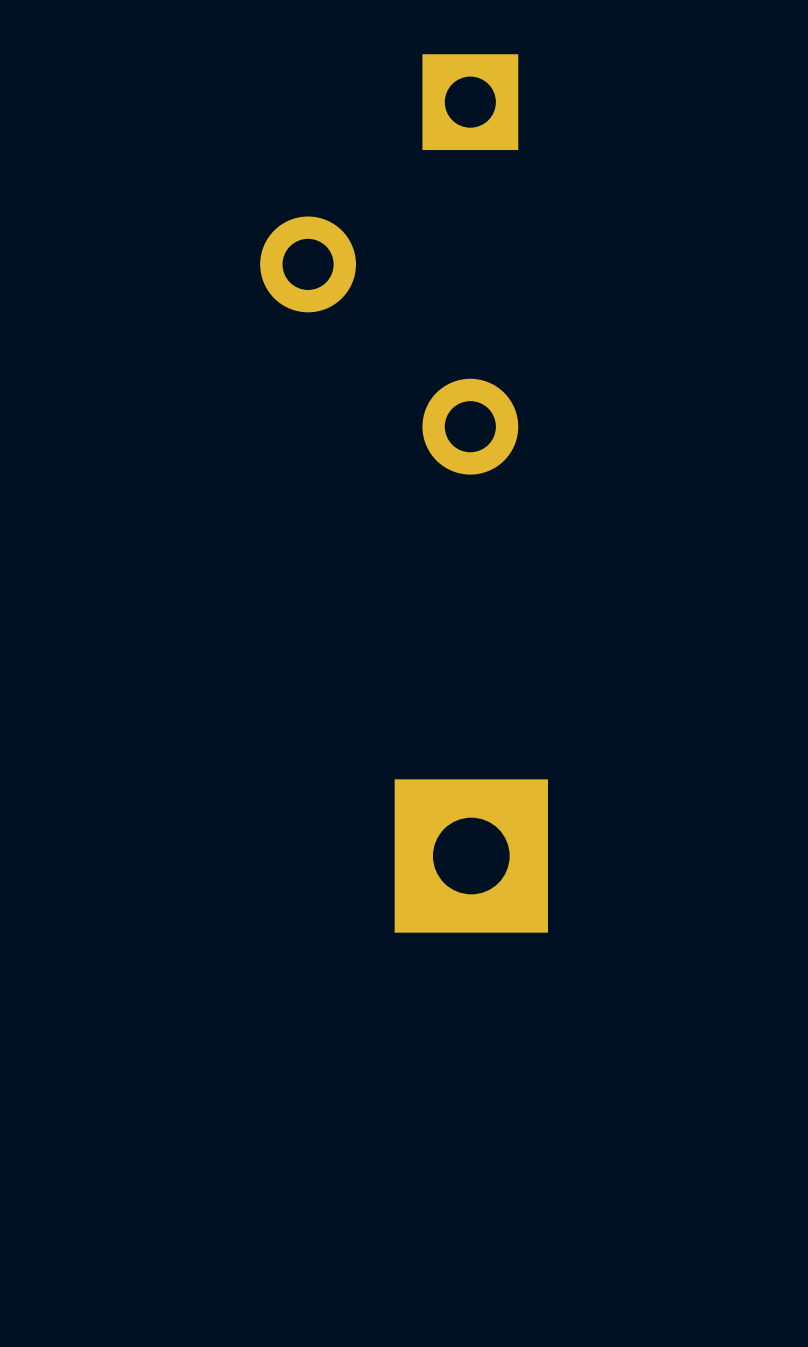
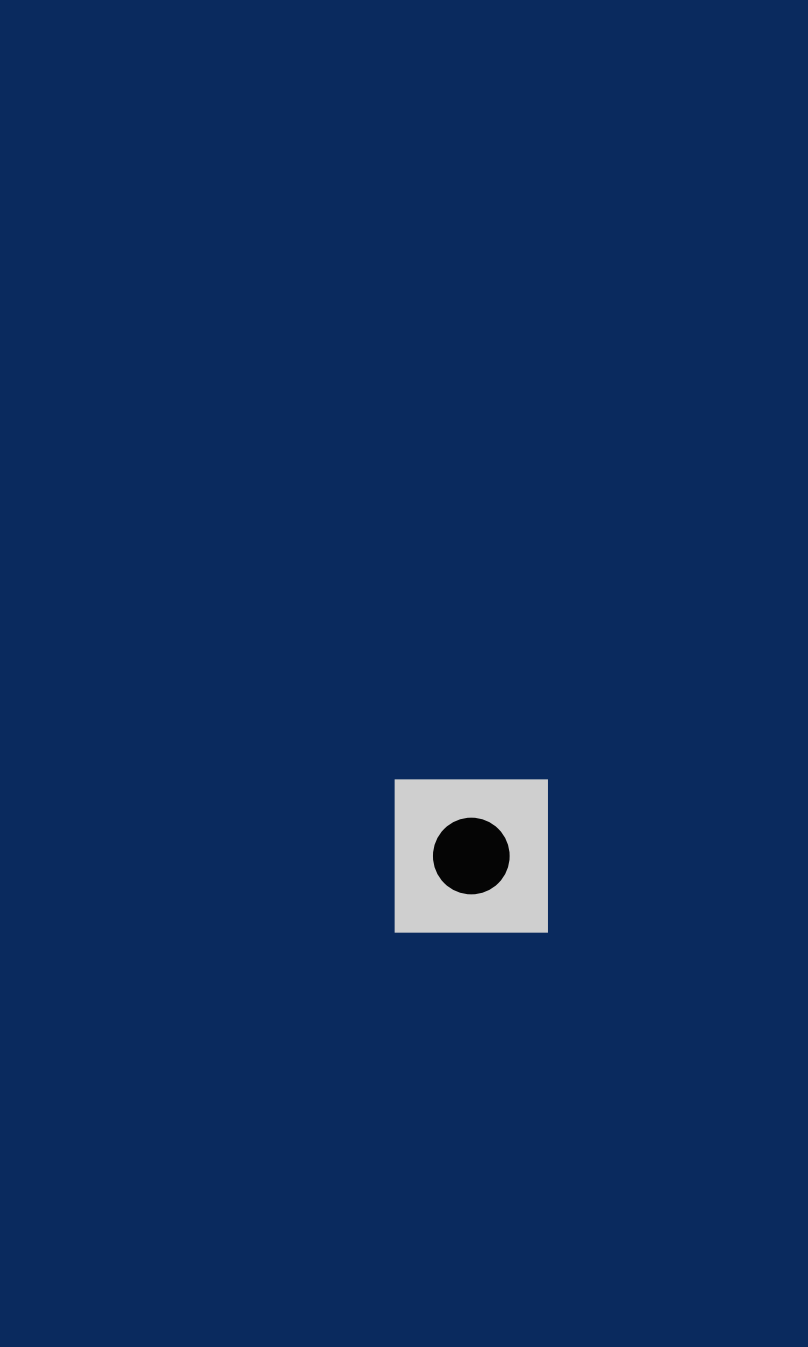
part: (389, 264) -> none

